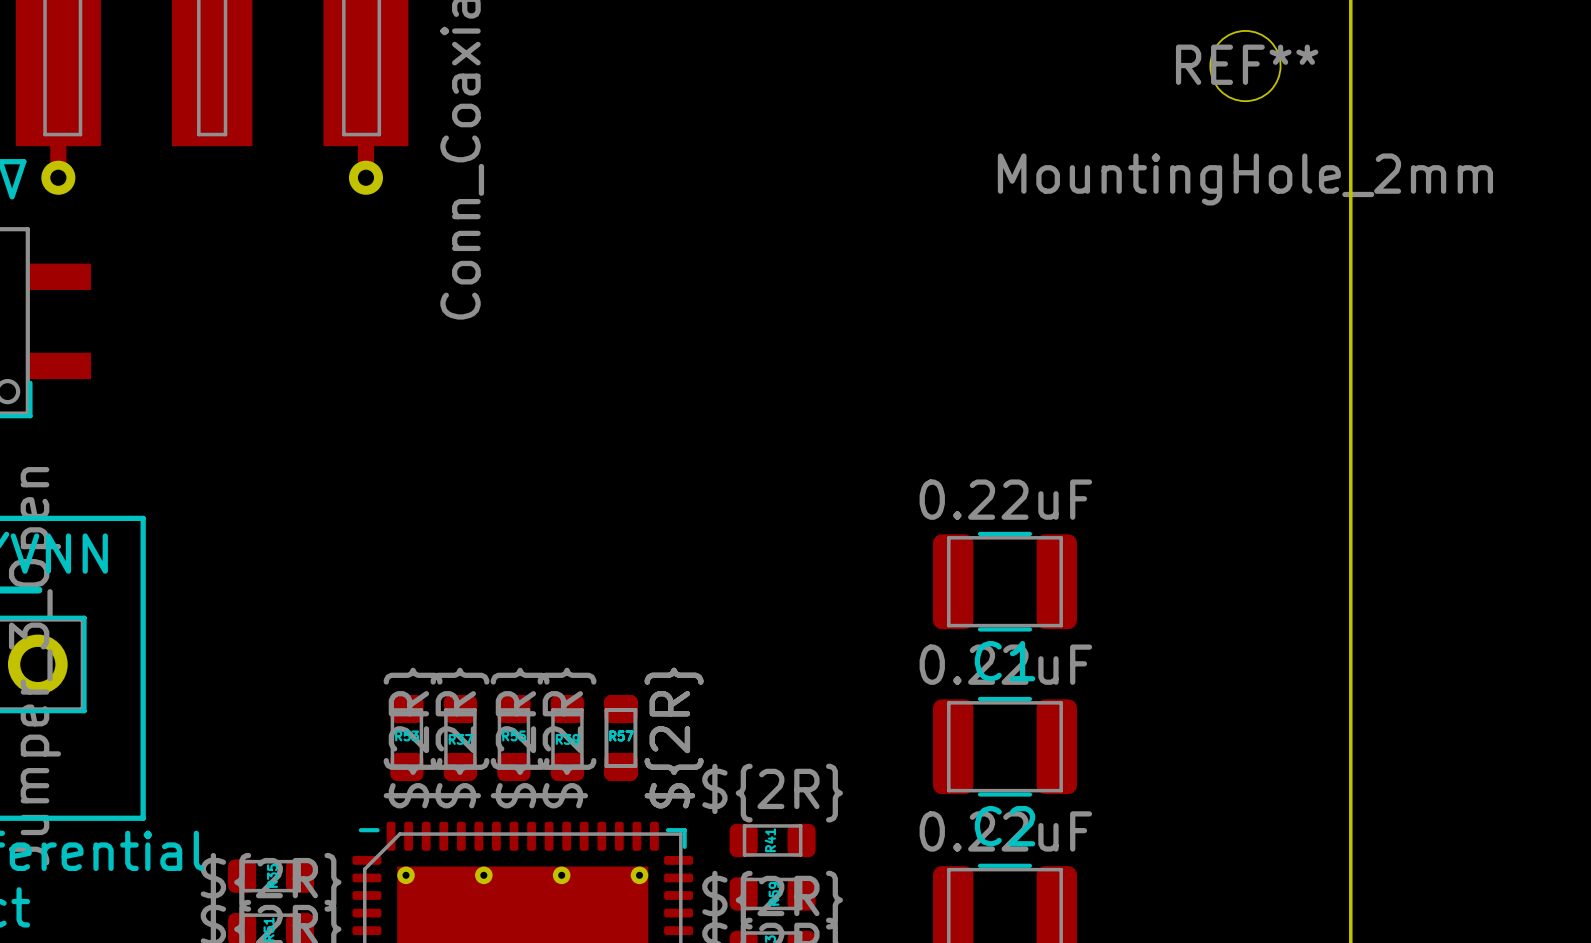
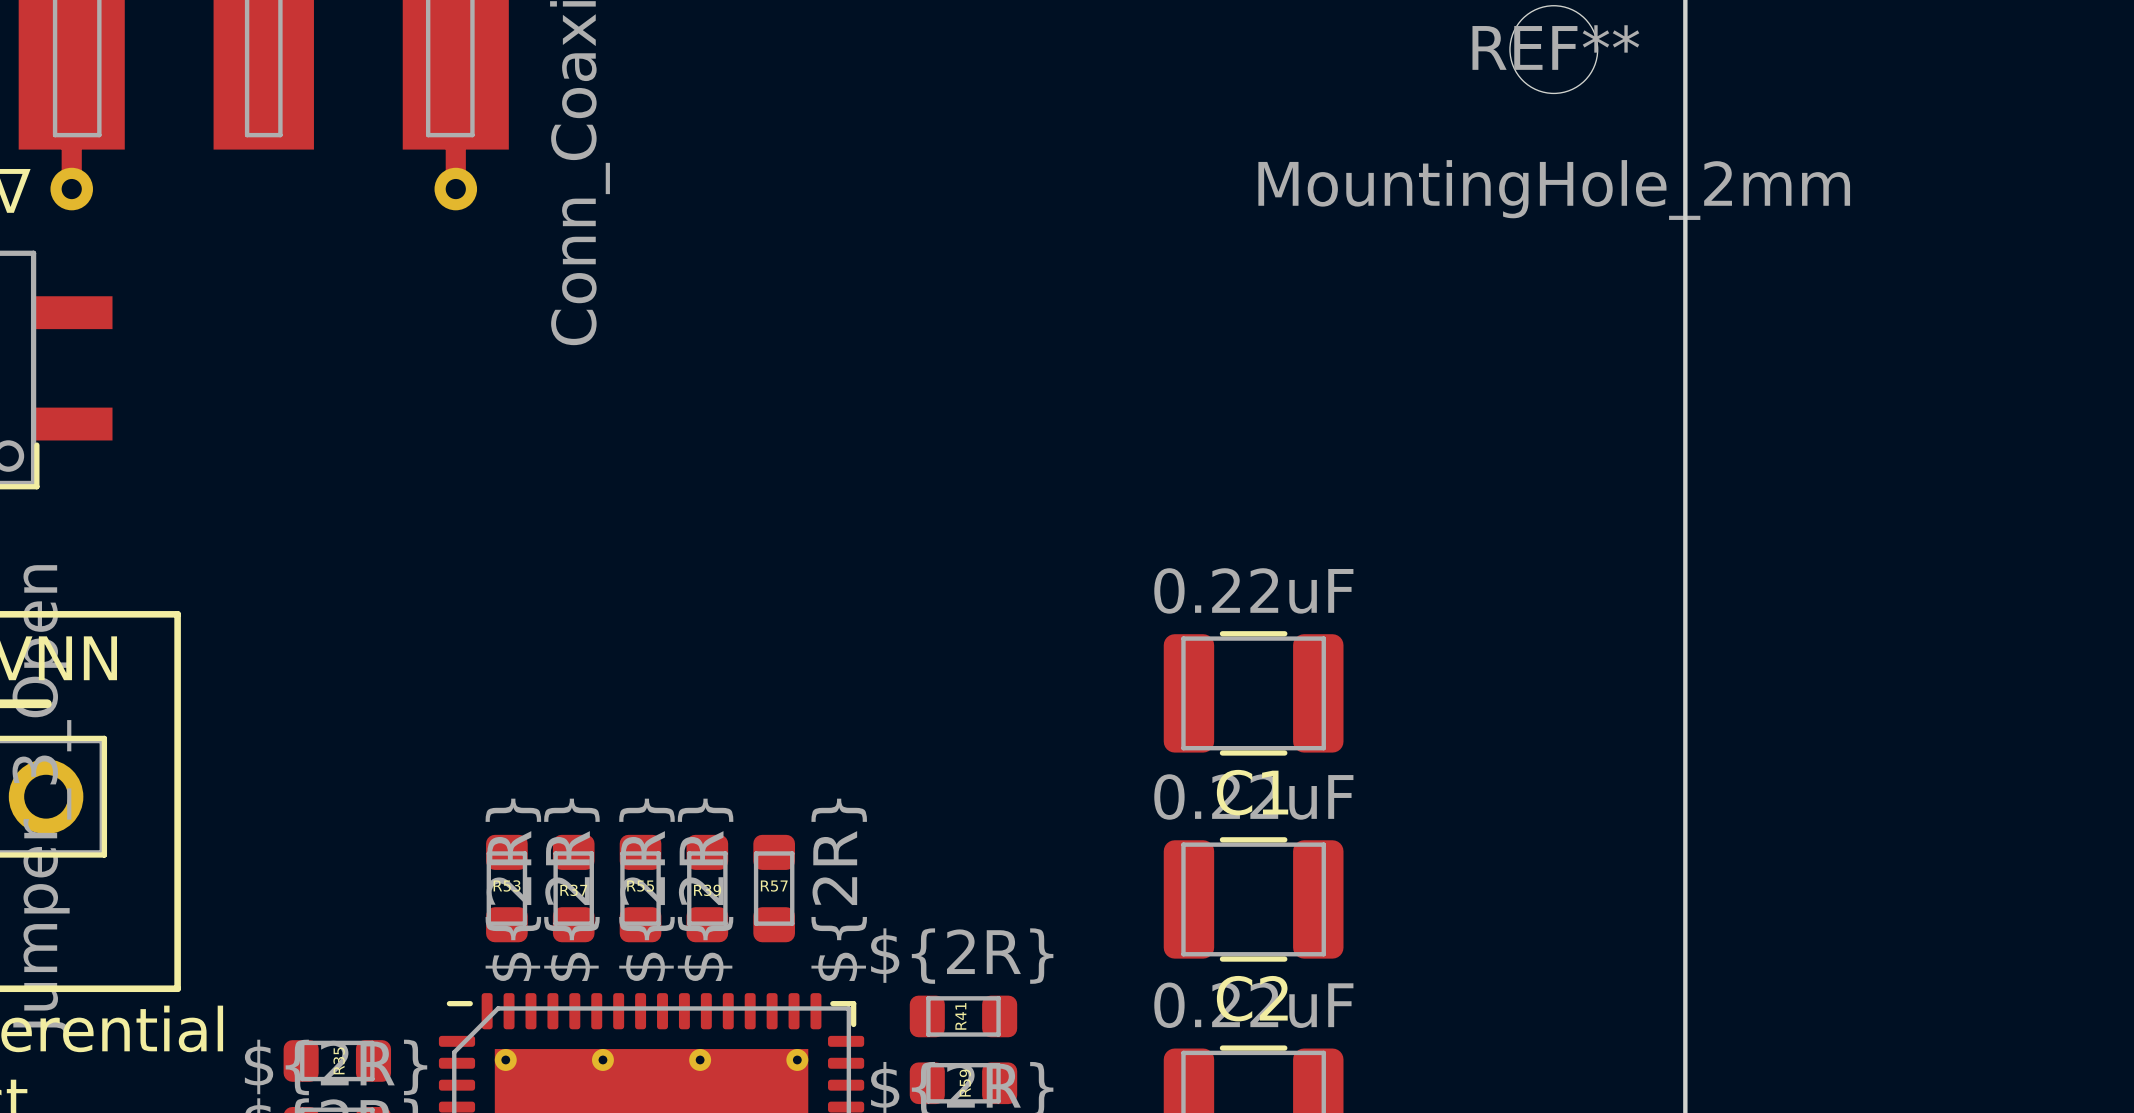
R57: ${2R} (620, 738) -> none

